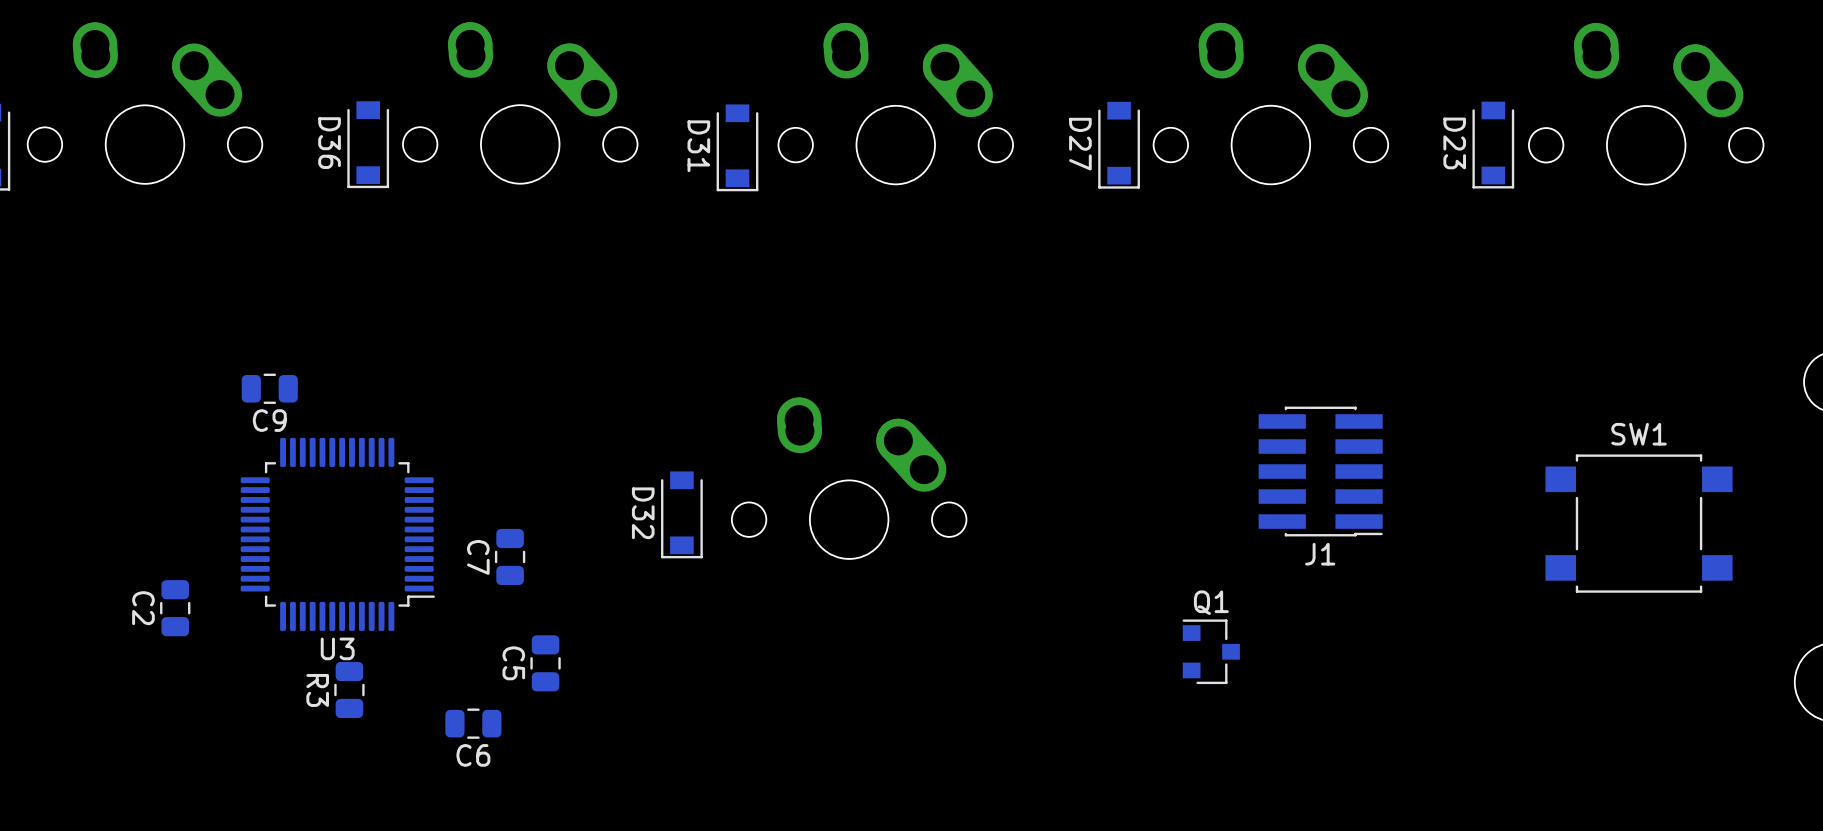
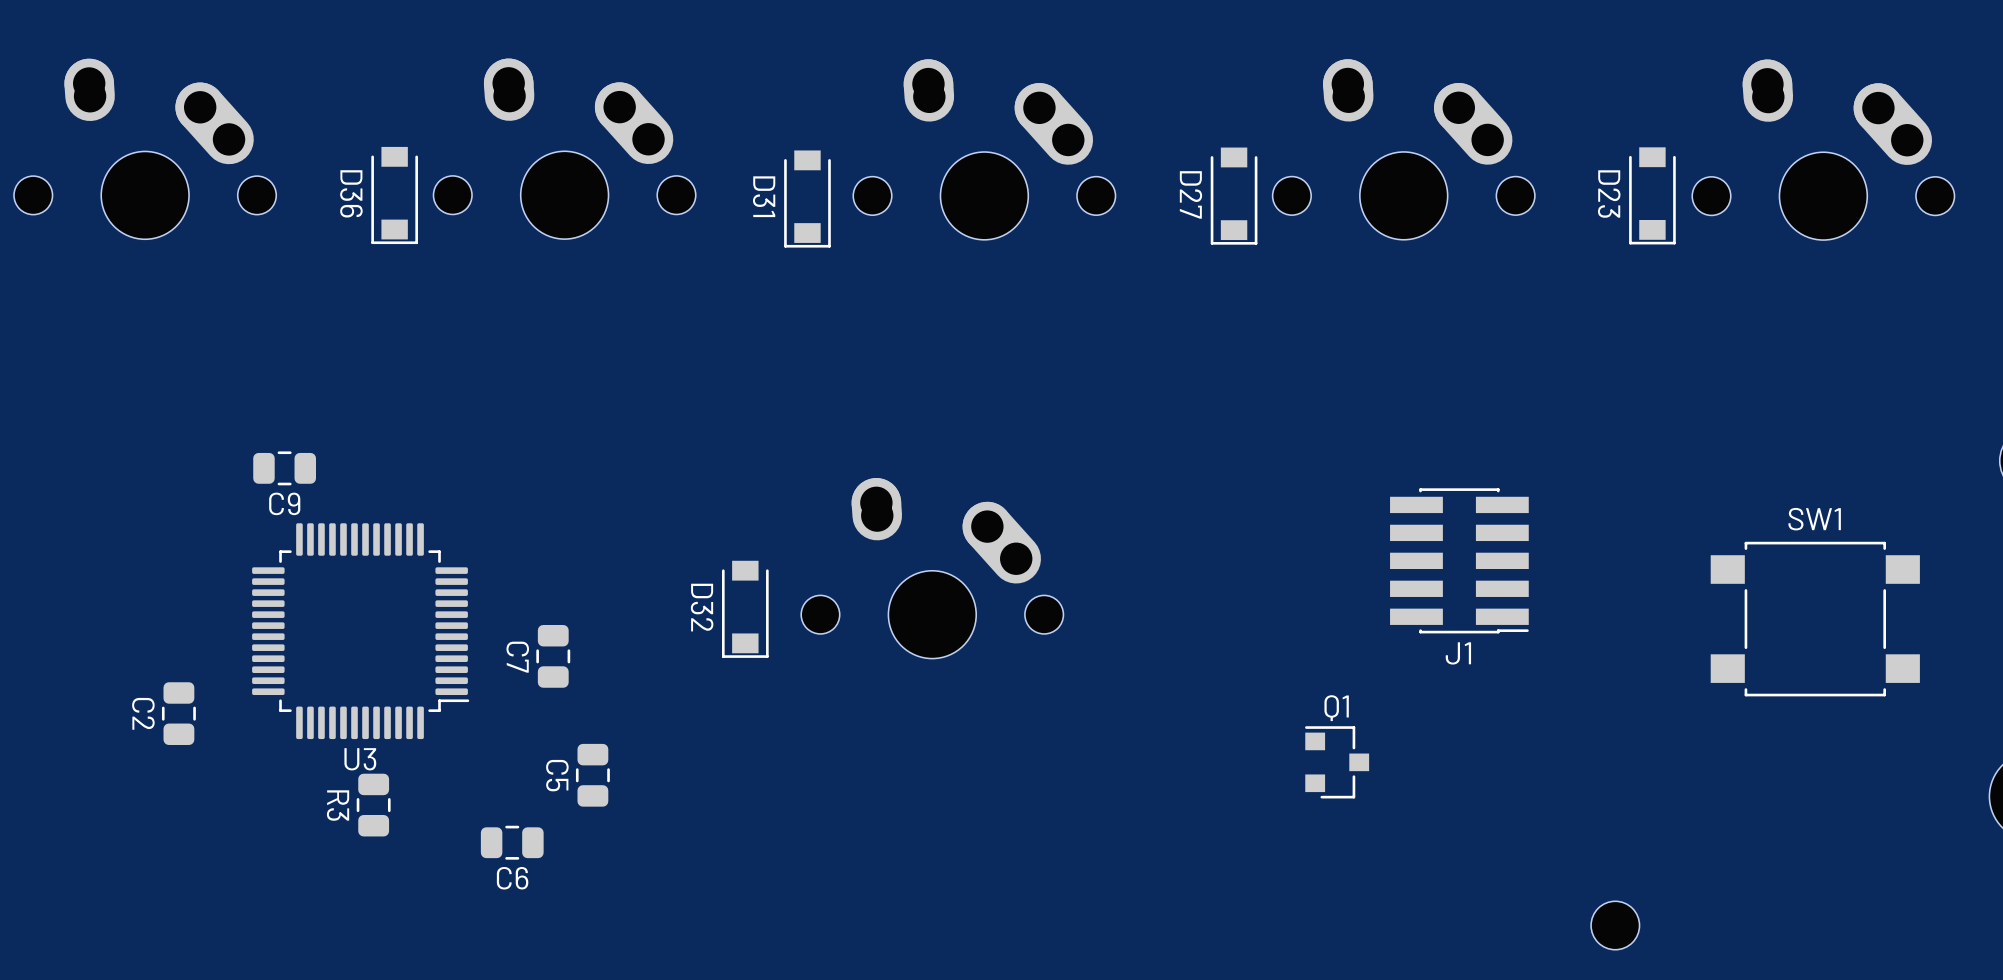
part: none -> (1615, 925)

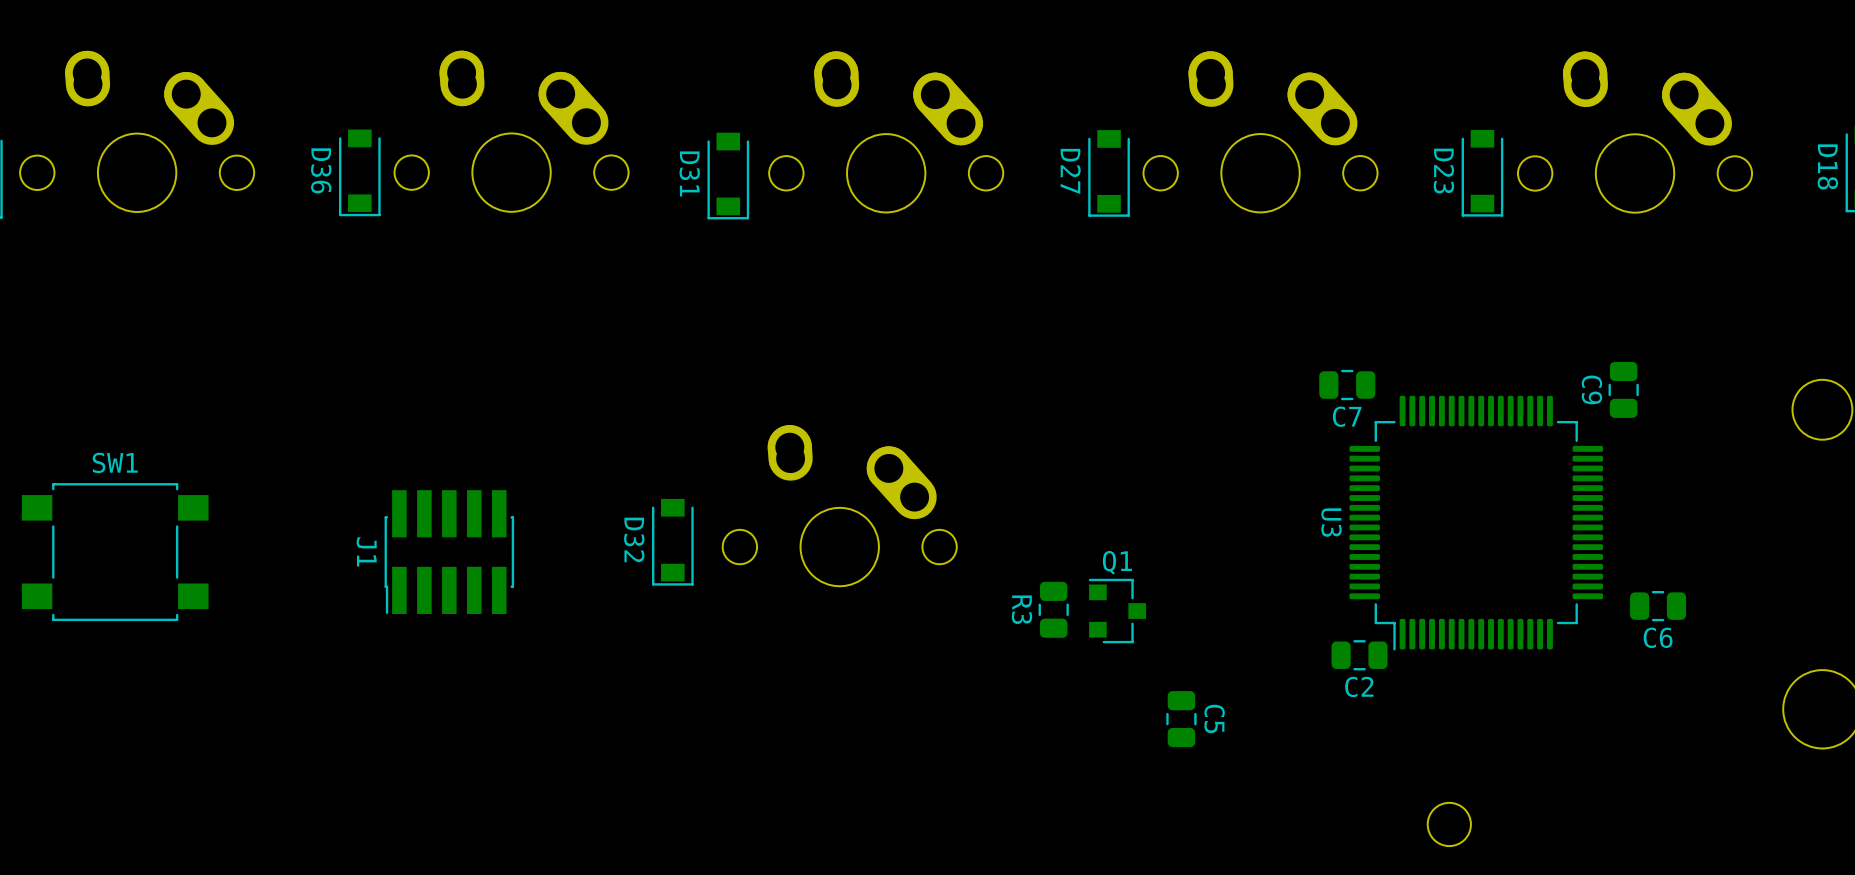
C9 rotation: 0° (284, 468) -> 90° clockwise (1623, 389)
C9 position: (284, 468) -> (1623, 389)
U3 footprint: [252, 523, 470, 740] -> [1349, 395, 1604, 651]
J1 rotation: 0° (1459, 560) -> 90° clockwise (449, 552)
J1 position: (1459, 560) -> (449, 552)
SW1 position: (1815, 619) -> (115, 552)
C7 rotation: 0° (553, 656) -> 90° clockwise (1347, 385)
C7 position: (553, 656) -> (1347, 385)
C7 name position: C7 (517, 657) -> C7 (1347, 416)
C2 name position: C2 (143, 713) -> C2 (1359, 686)
C2 rotation: 0° (178, 713) -> 90° clockwise (1359, 655)
C2 position: (178, 713) -> (1359, 655)
U3 name position: U3 (360, 759) -> U3 (1331, 522)
Q1 position: (1337, 762) -> (1117, 611)
C5 name position: C5 (557, 775) -> C5 (1214, 718)
C5 position: (592, 775) -> (1181, 719)
R3 position: (373, 805) -> (1053, 609)
C6 position: (512, 842) -> (1658, 606)

